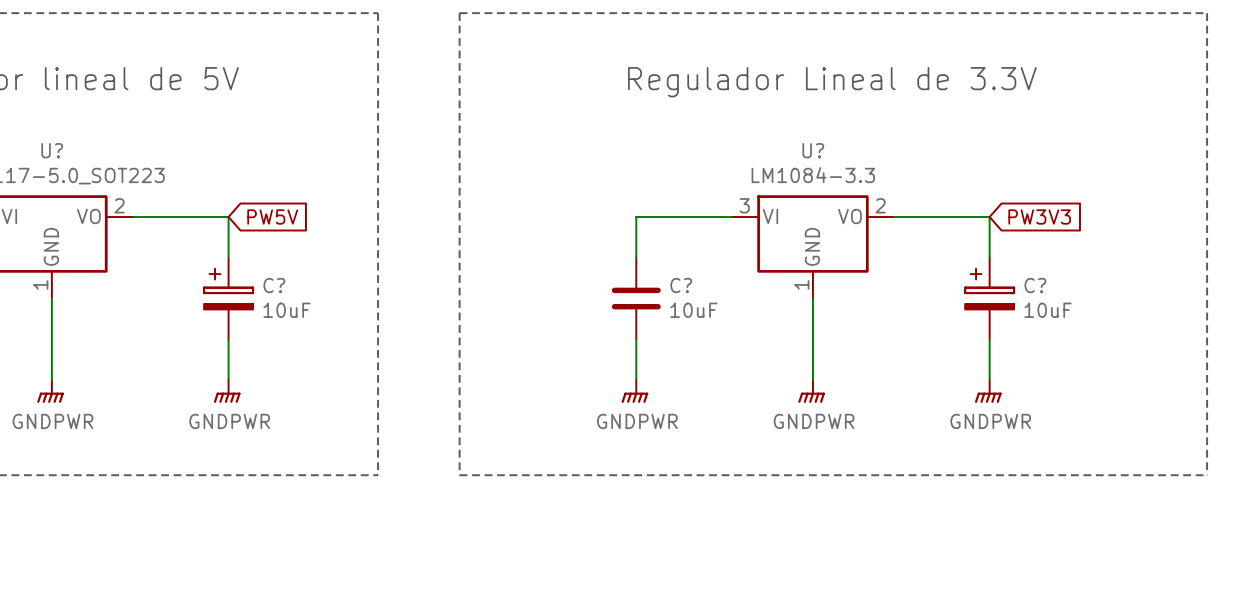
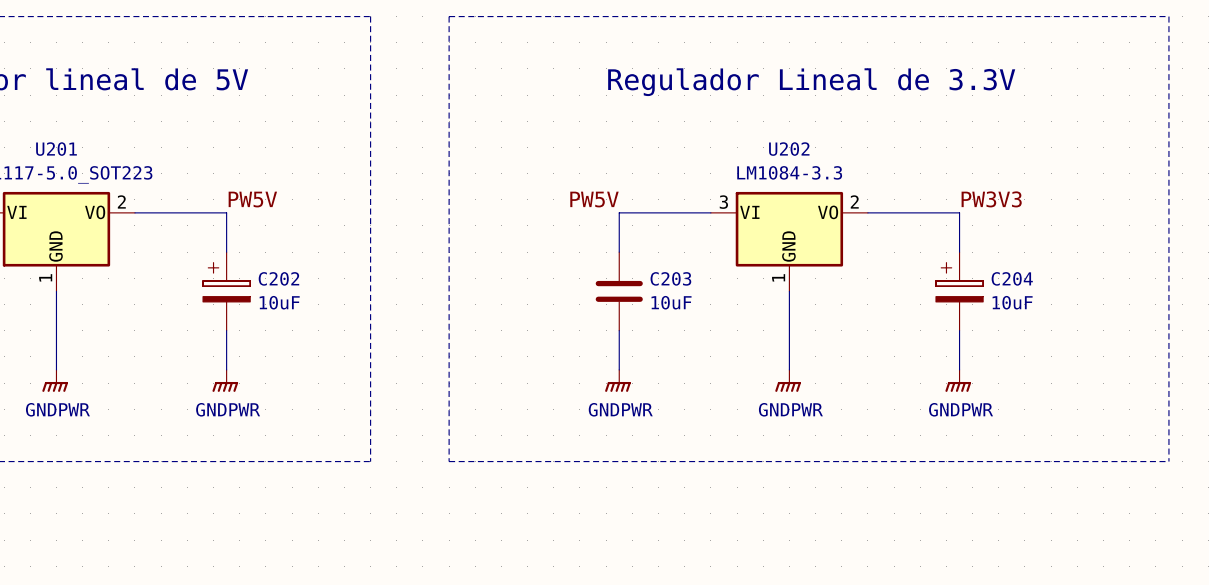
U? name: U? (52, 150) -> U201 (56, 149)
U? name: U? (813, 150) -> U202 (789, 149)
label: none -> PW5V (252, 199)
label: none -> PW5V (594, 199)
label: none -> PW3V3 (991, 199)
global label: PW5V (272, 217) -> none
global label: PW3V3 (1039, 217) -> none
C? name: C? (274, 285) -> C202 (278, 278)
C? name: C? (681, 285) -> C203 (670, 278)
C? name: C? (1035, 285) -> C204 (1012, 278)

